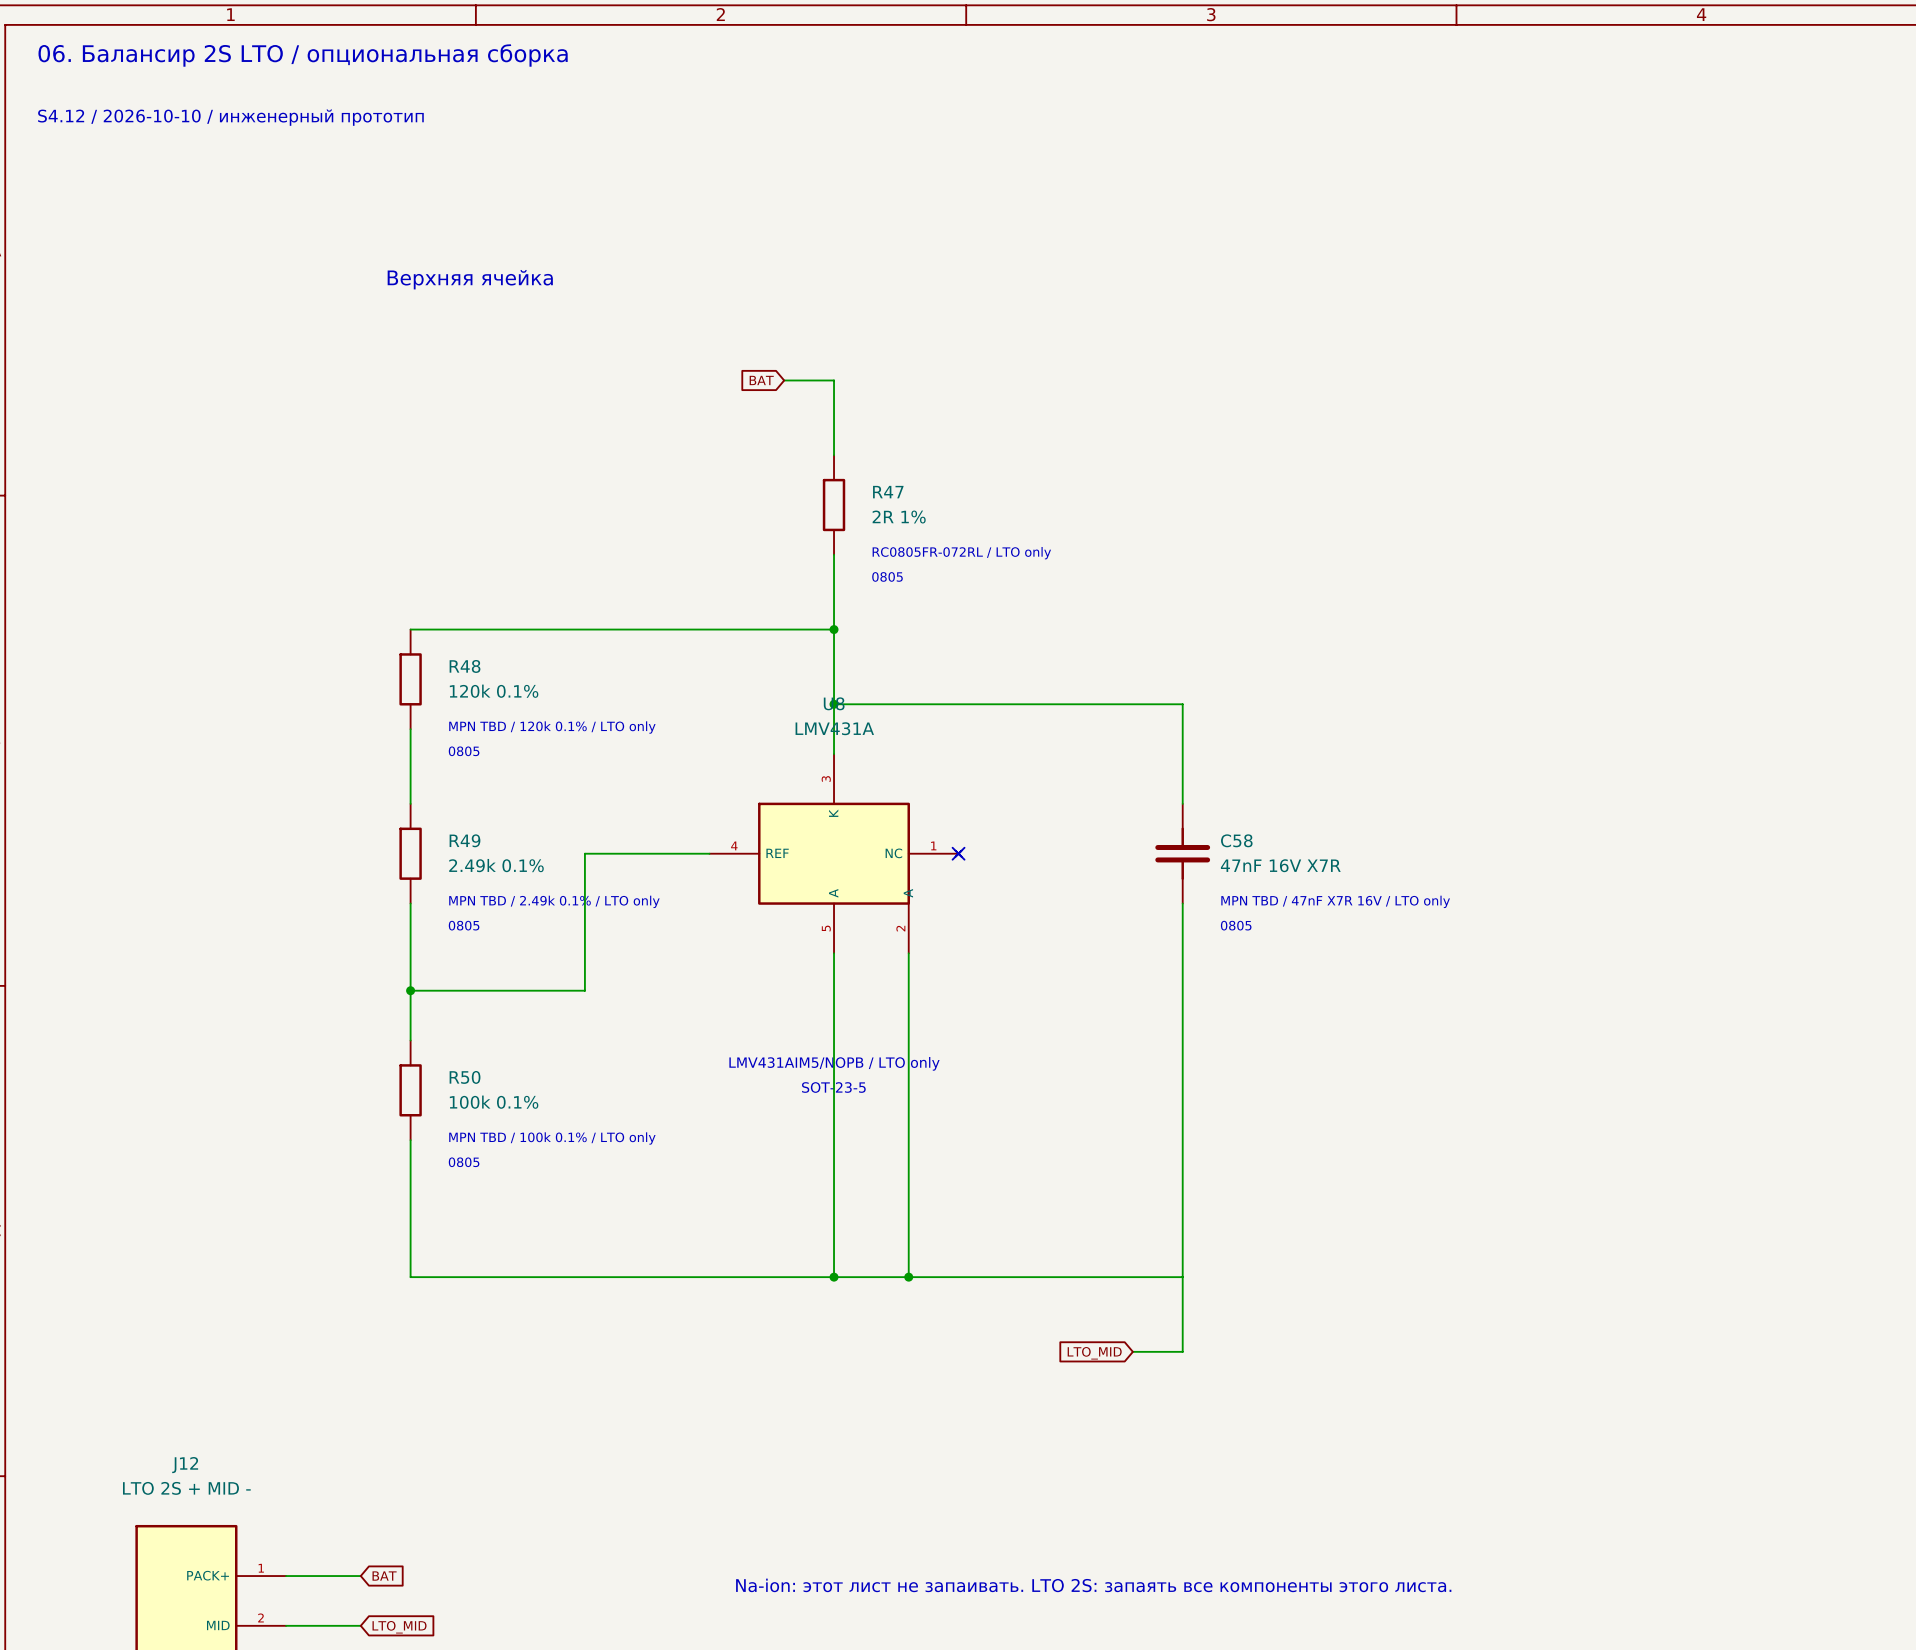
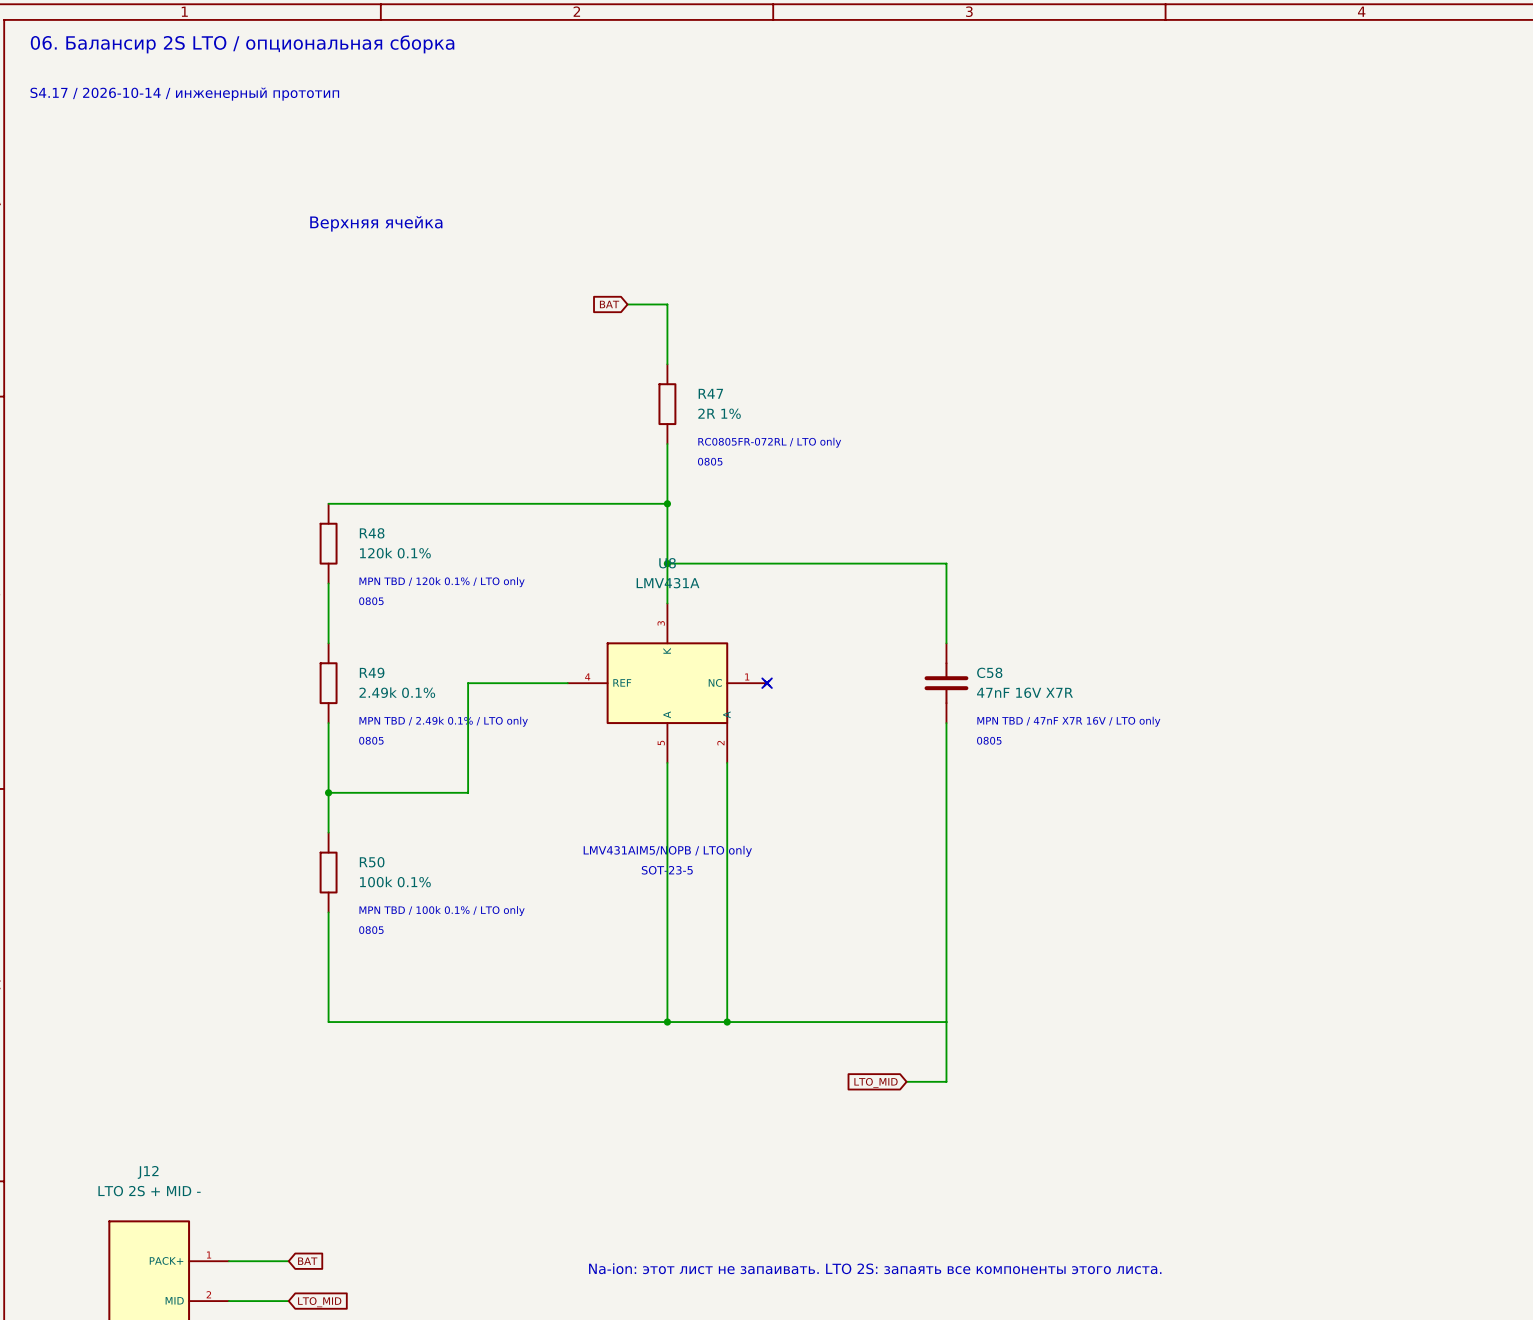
text: S4.12 / 2026-10-10 / инженерный прототип (230, 117) -> S4.17 / 2026-10-14 / инженерный прототип (184, 94)

